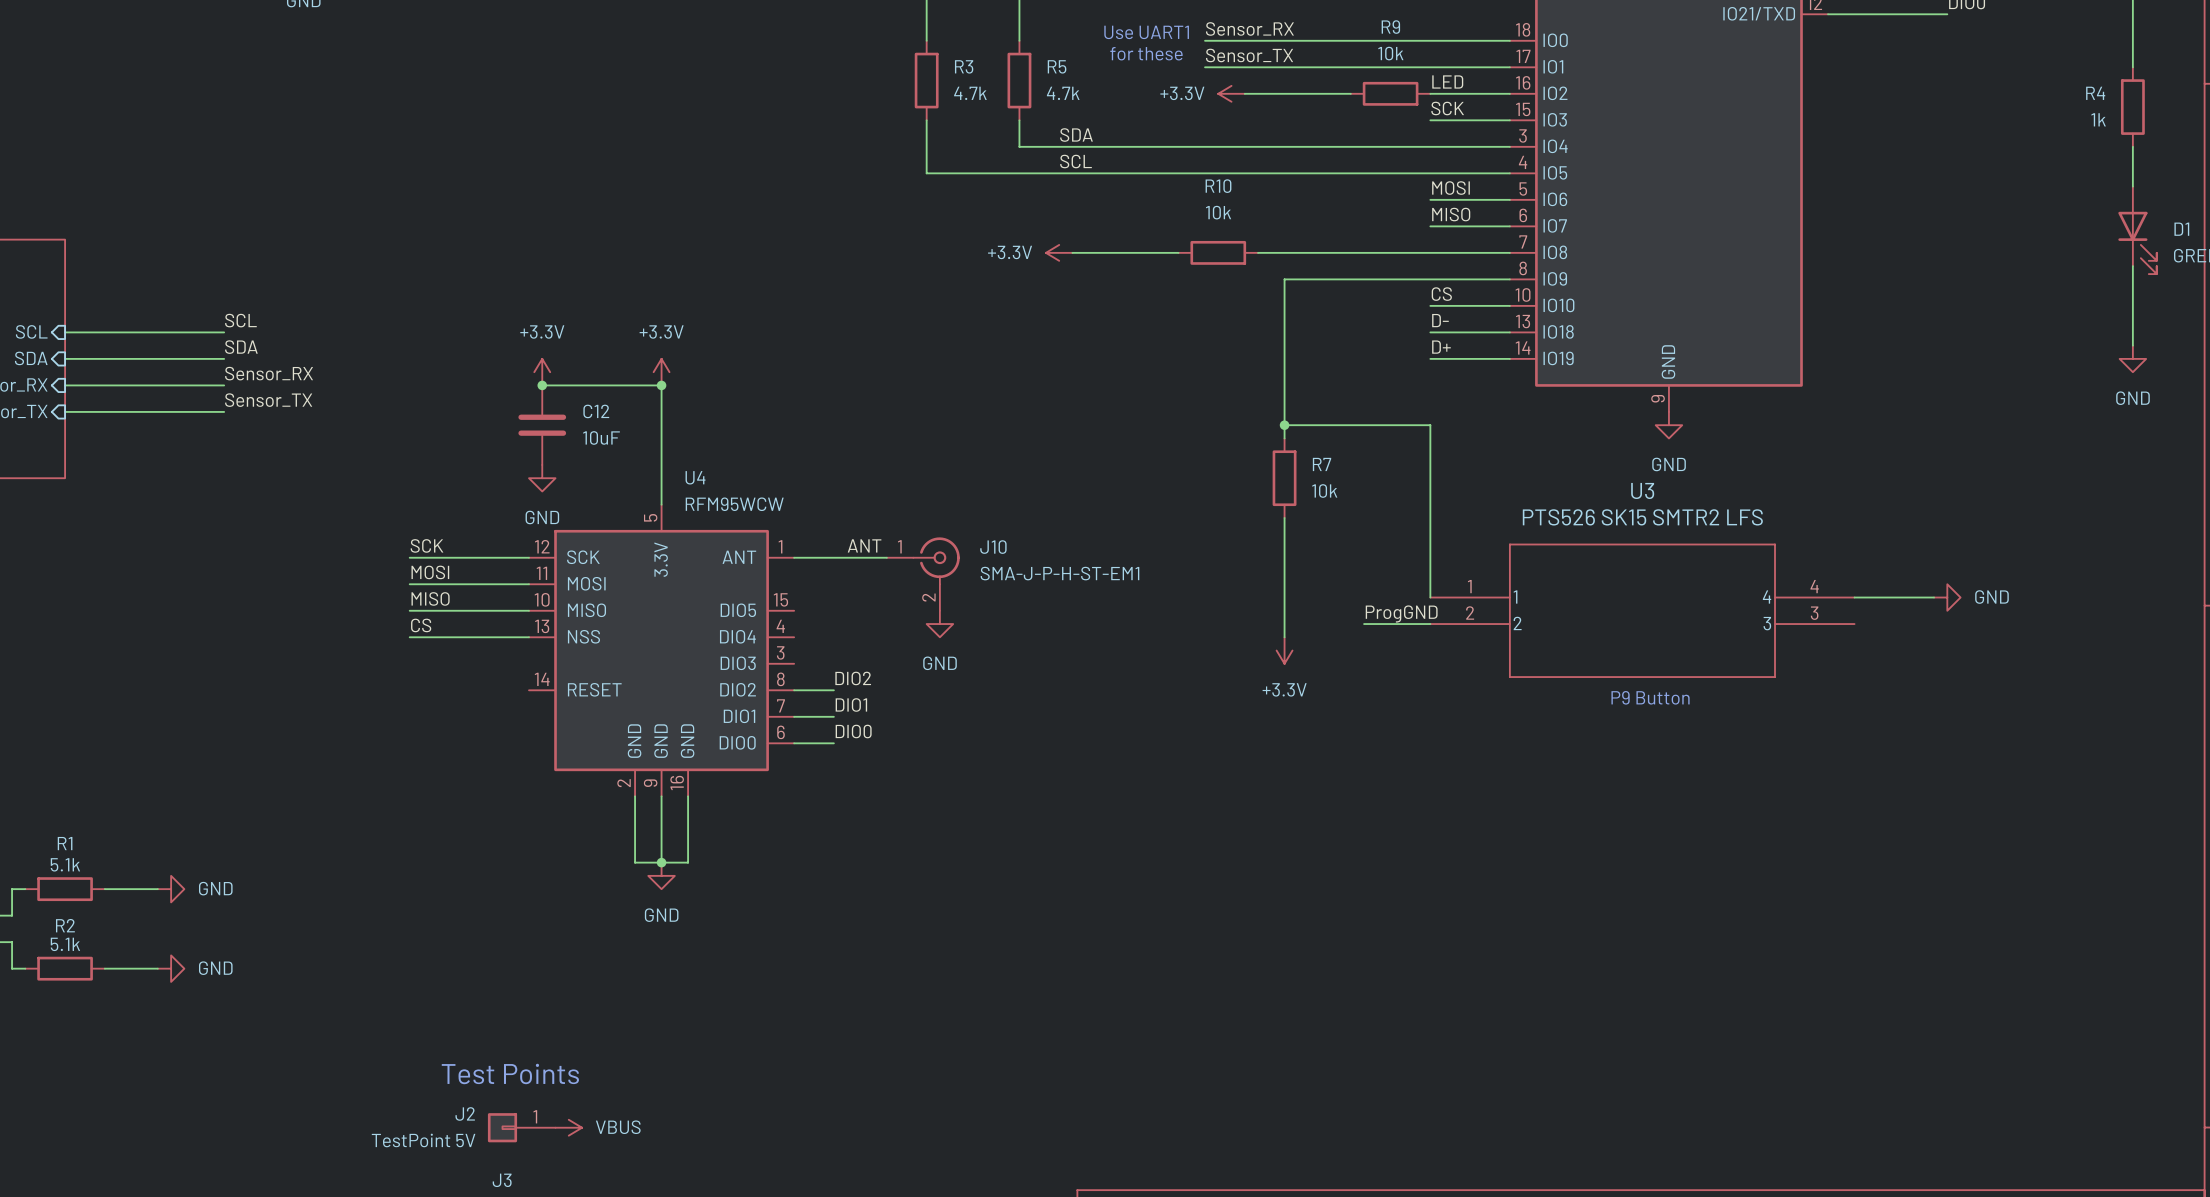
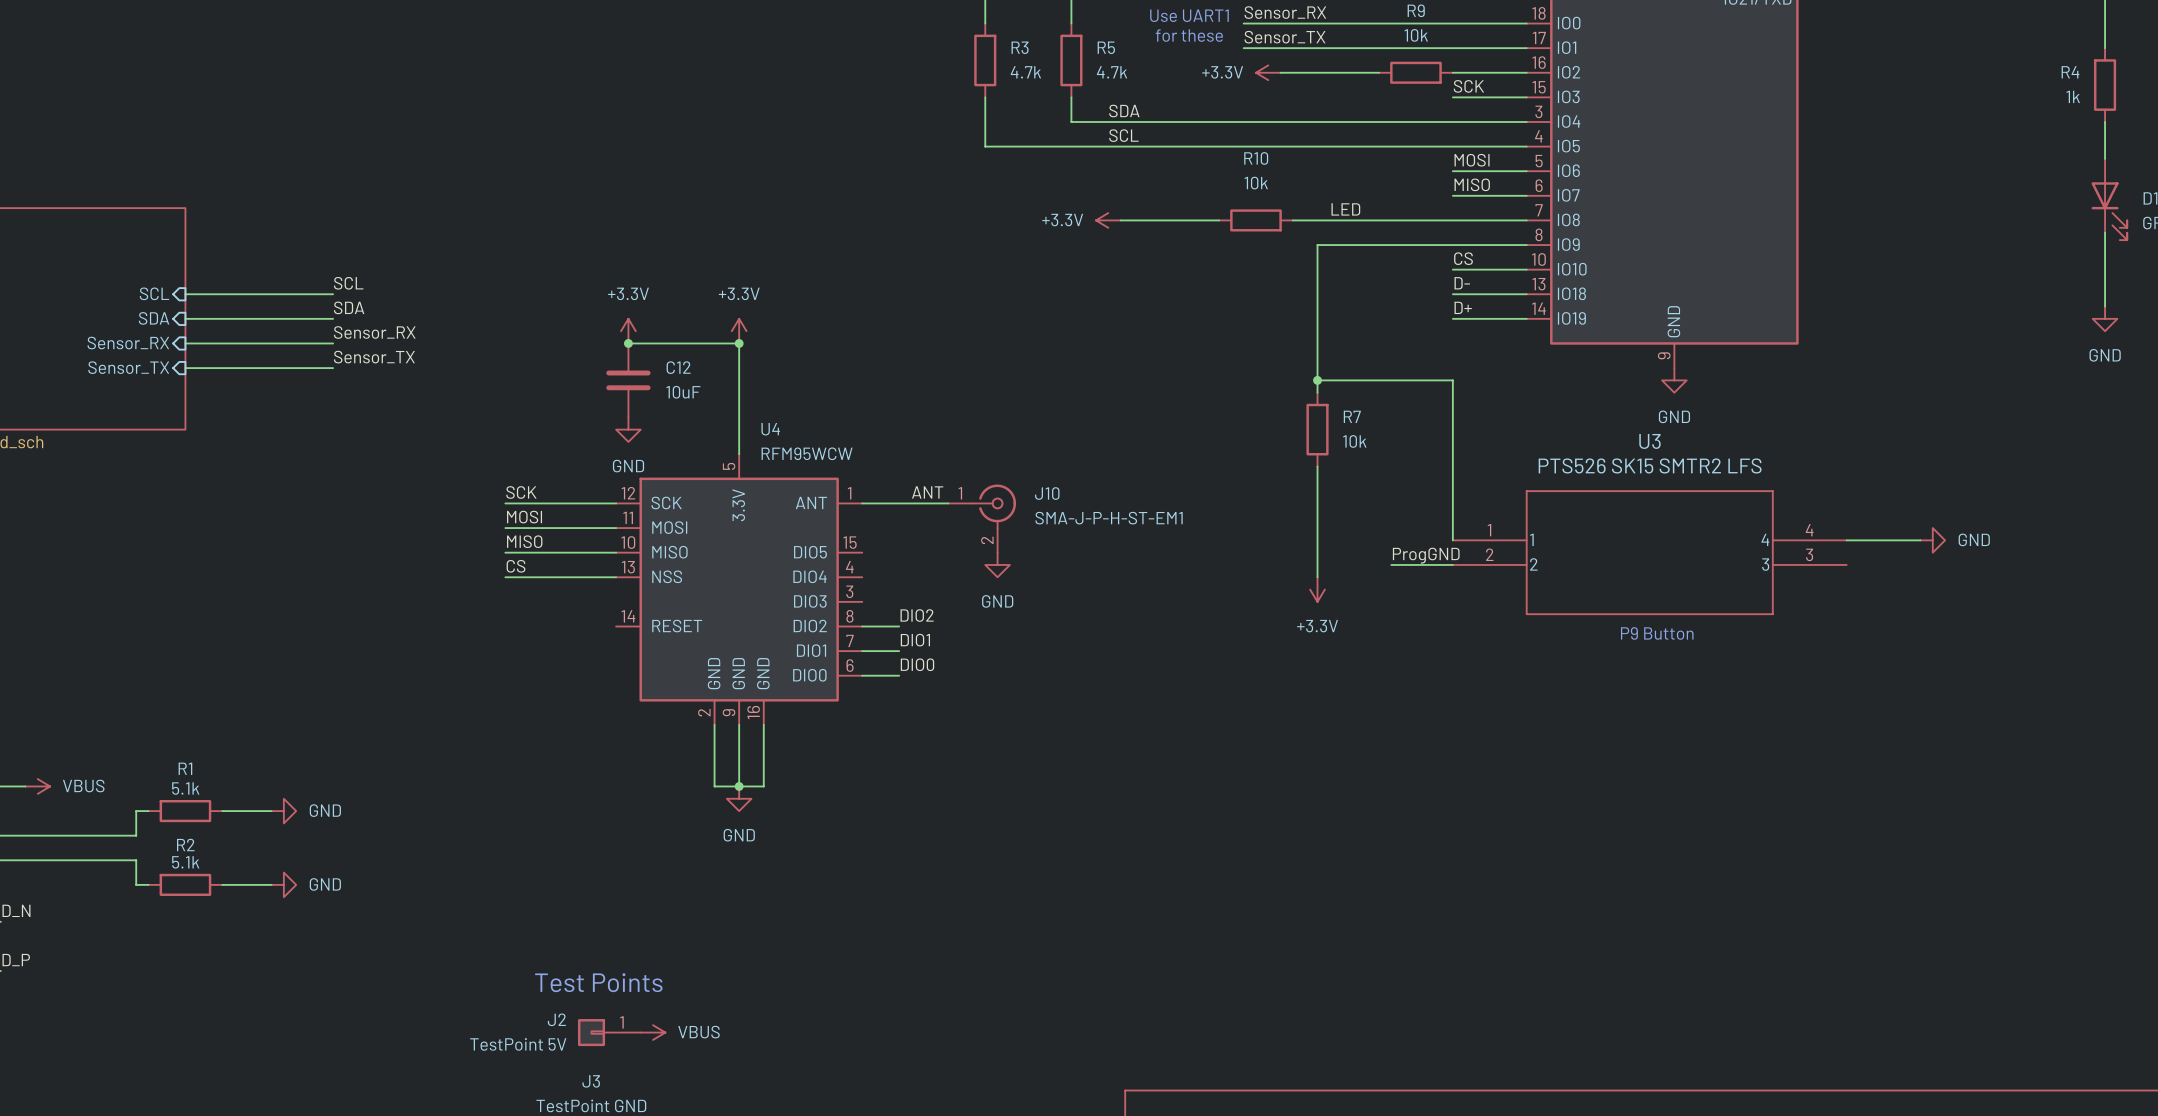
label position: LED (1447, 81) -> LED (1345, 209)

